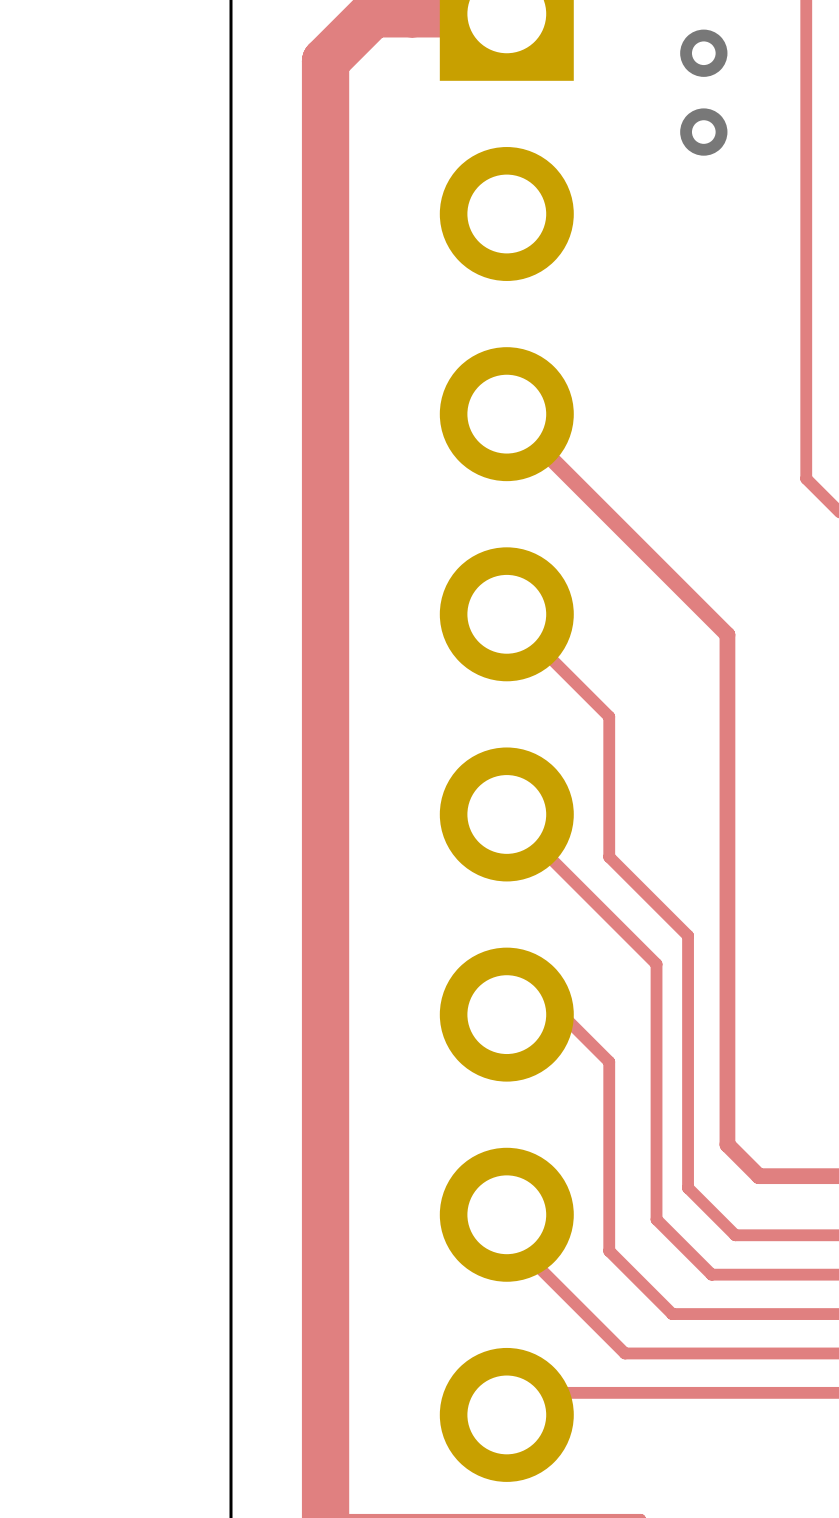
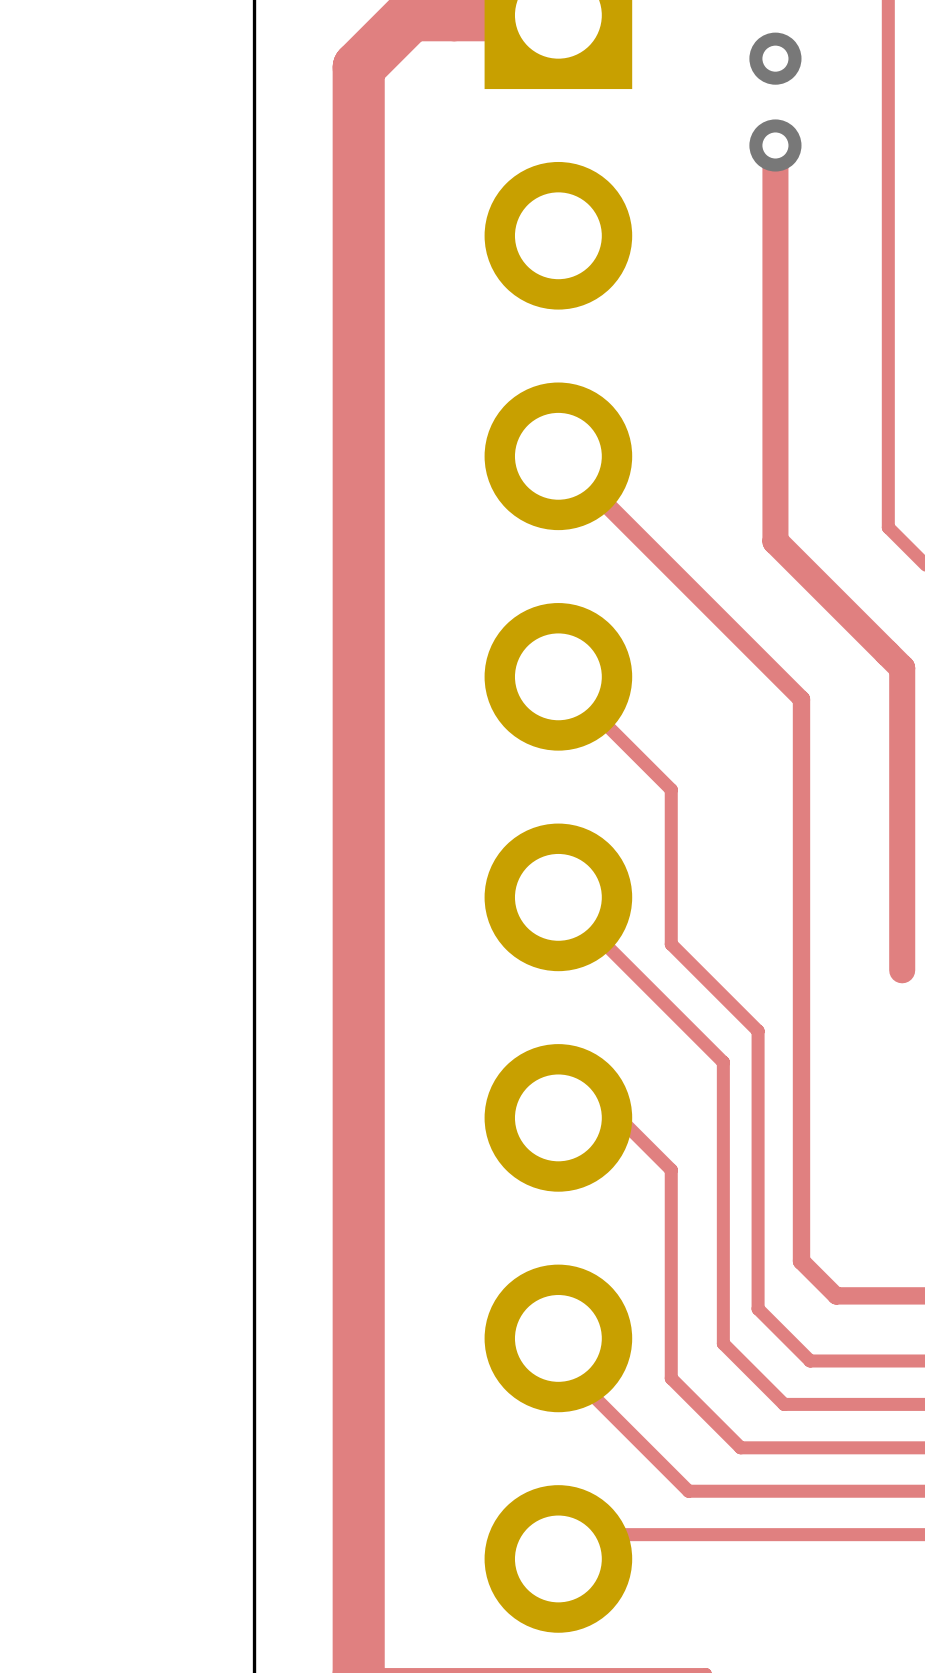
track: none -> (775, 145) (775, 541) (902, 668) (902, 970)

